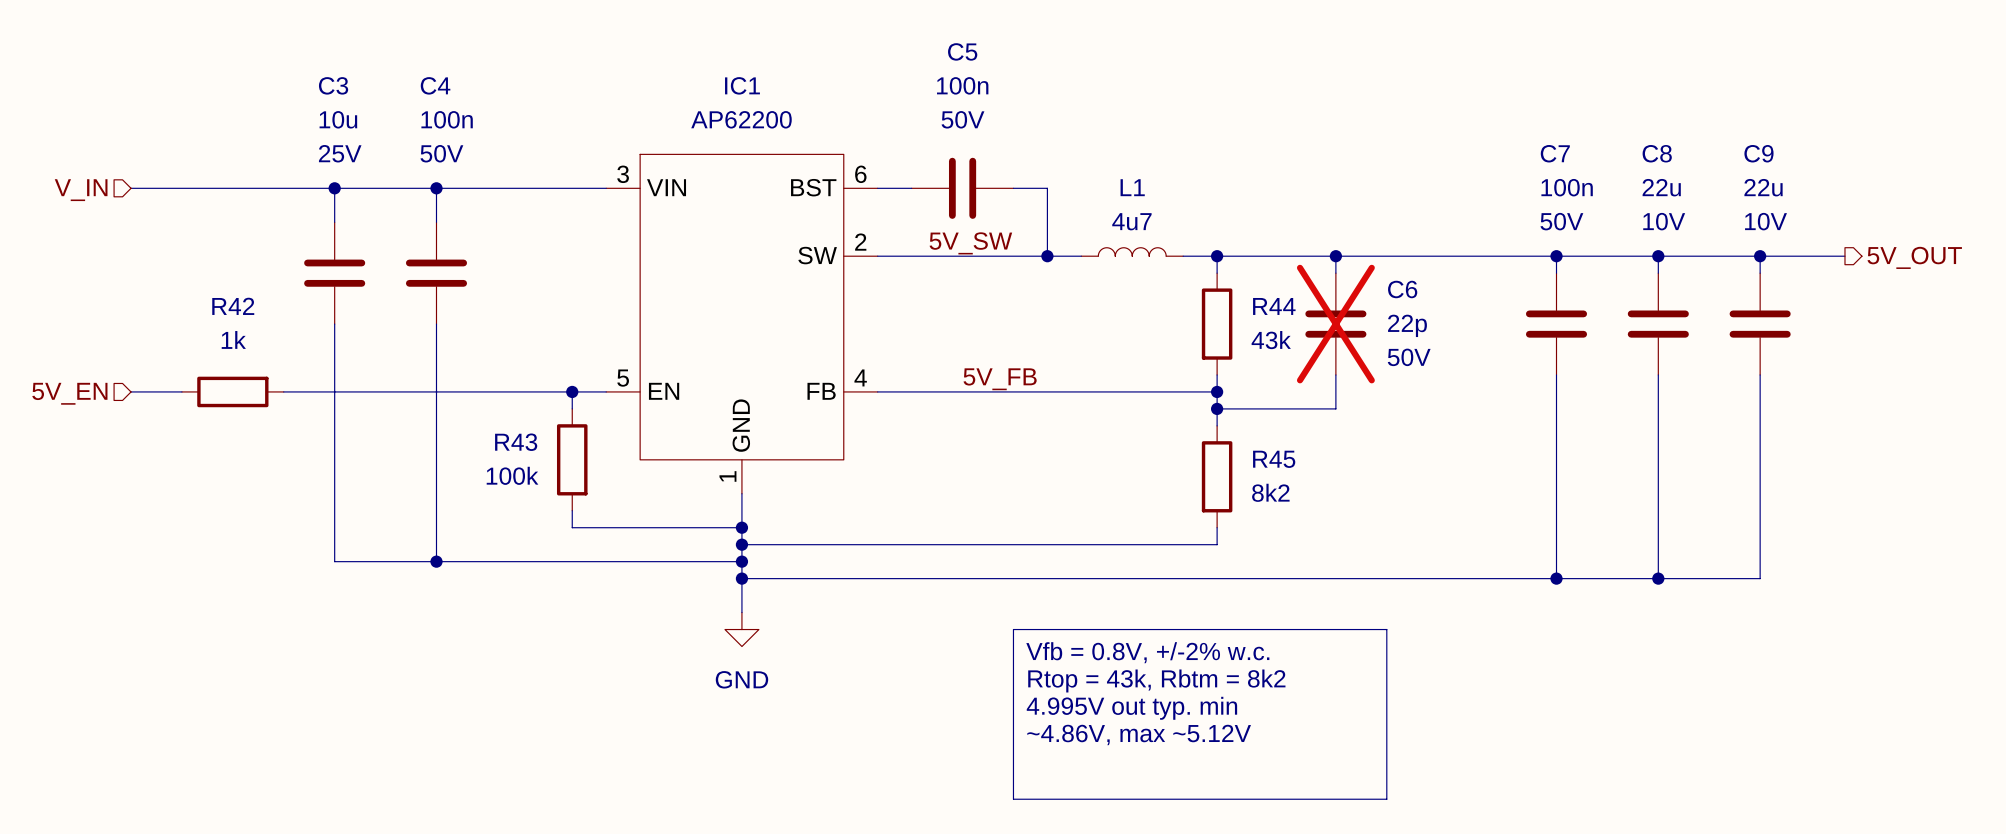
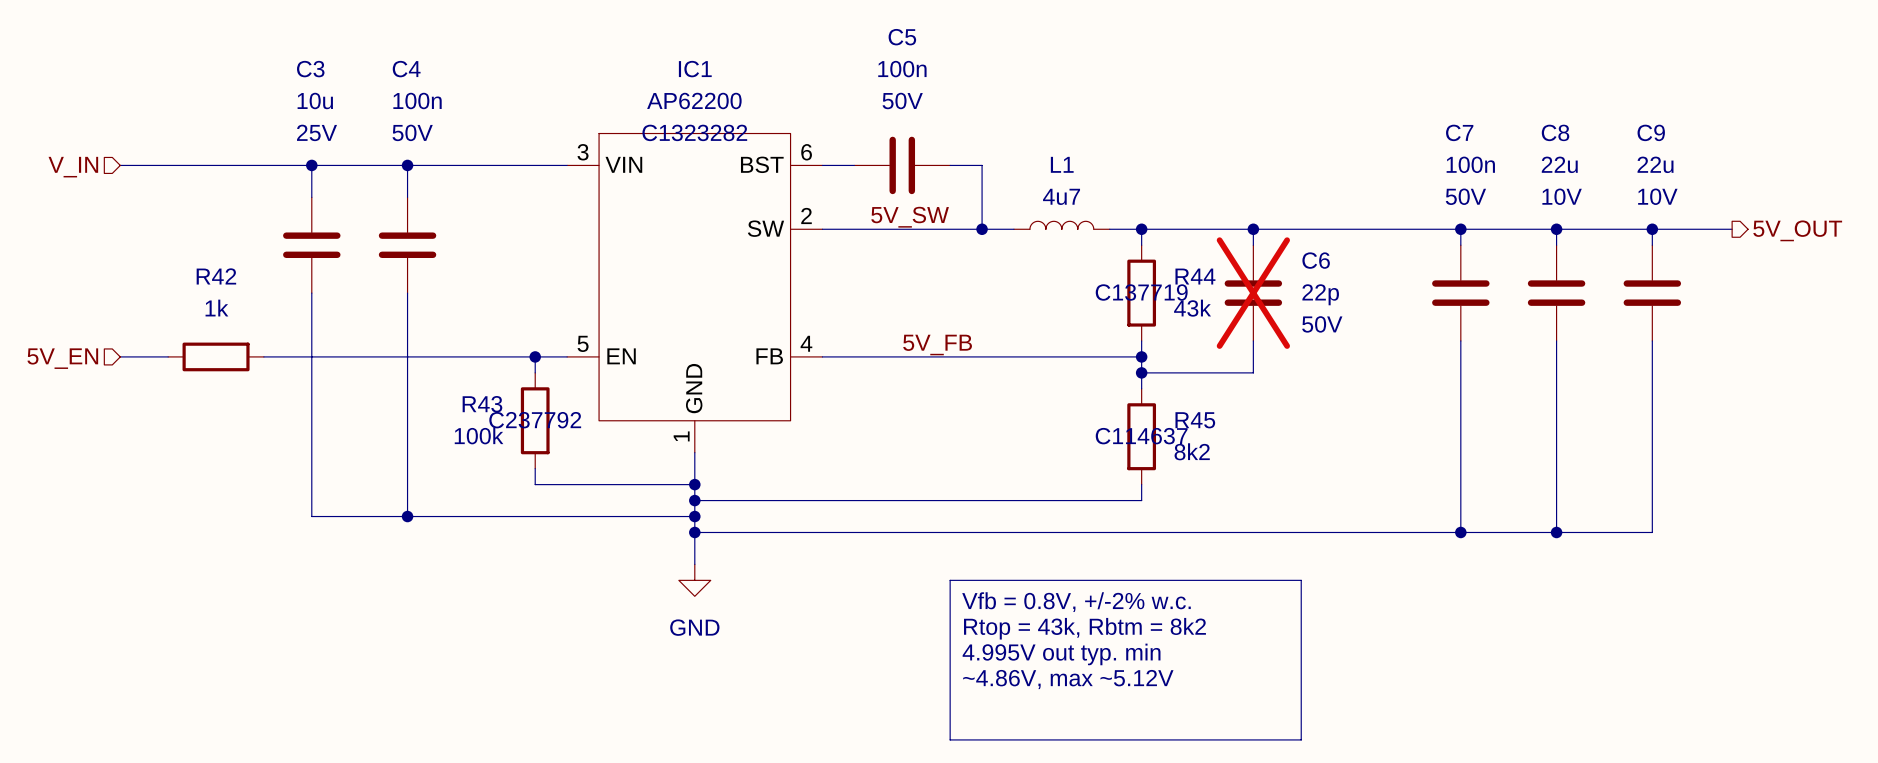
IC1 text: none -> C1323282 (694, 132)
R44 text: none -> C137719 (1141, 292)
R43 text: none -> C237792 (535, 420)
R45 text: none -> C114637 (1141, 436)

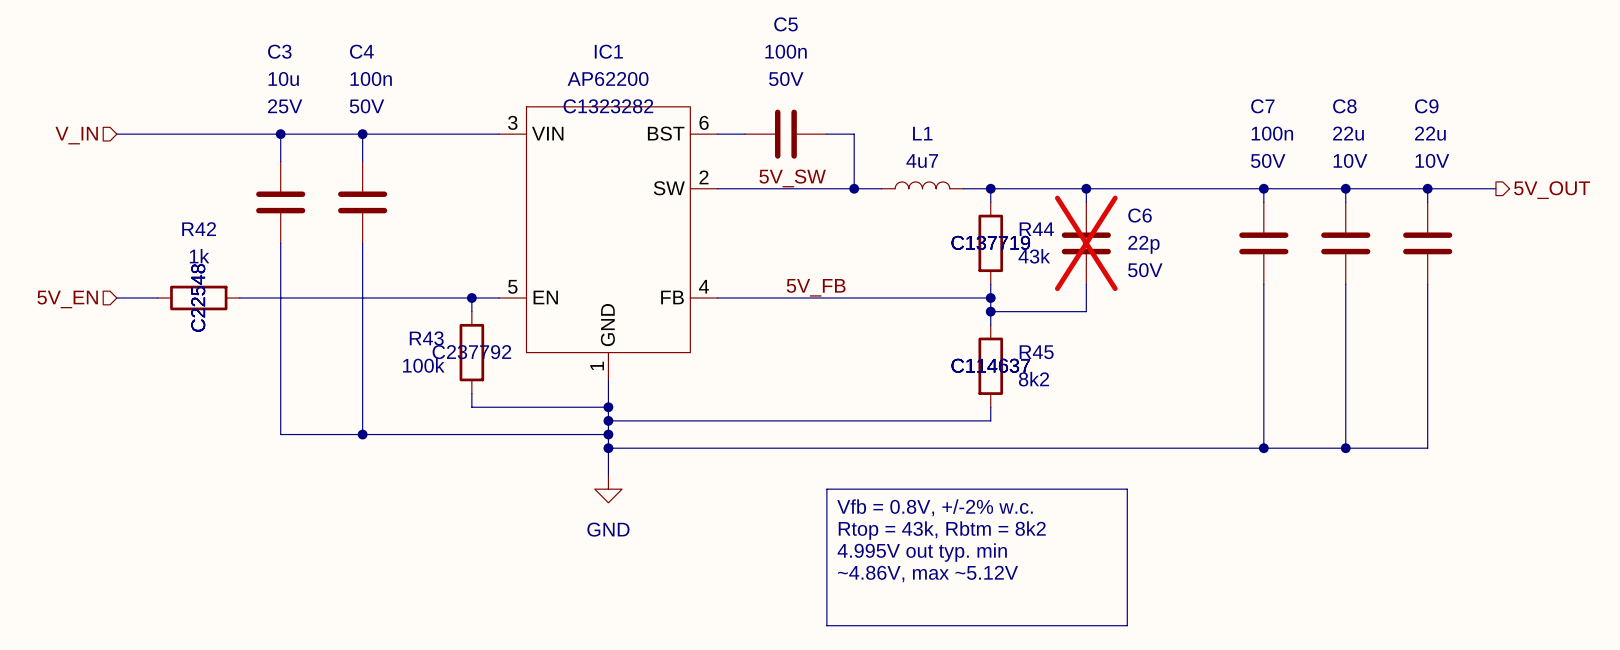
R44 text: none -> C137719 (990, 242)
R42 text: none -> C22548 (198, 297)
R42 text: none -> C22548 (198, 297)
R45 text: none -> C114637 (990, 365)

